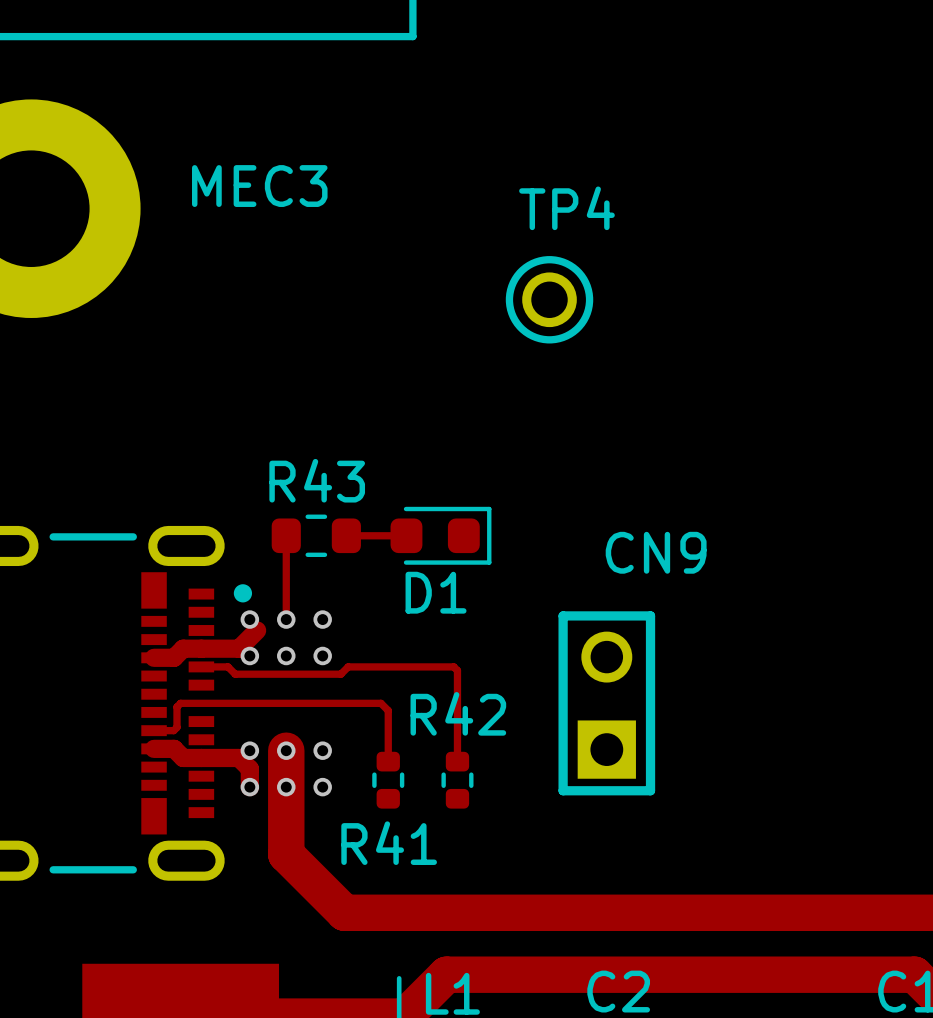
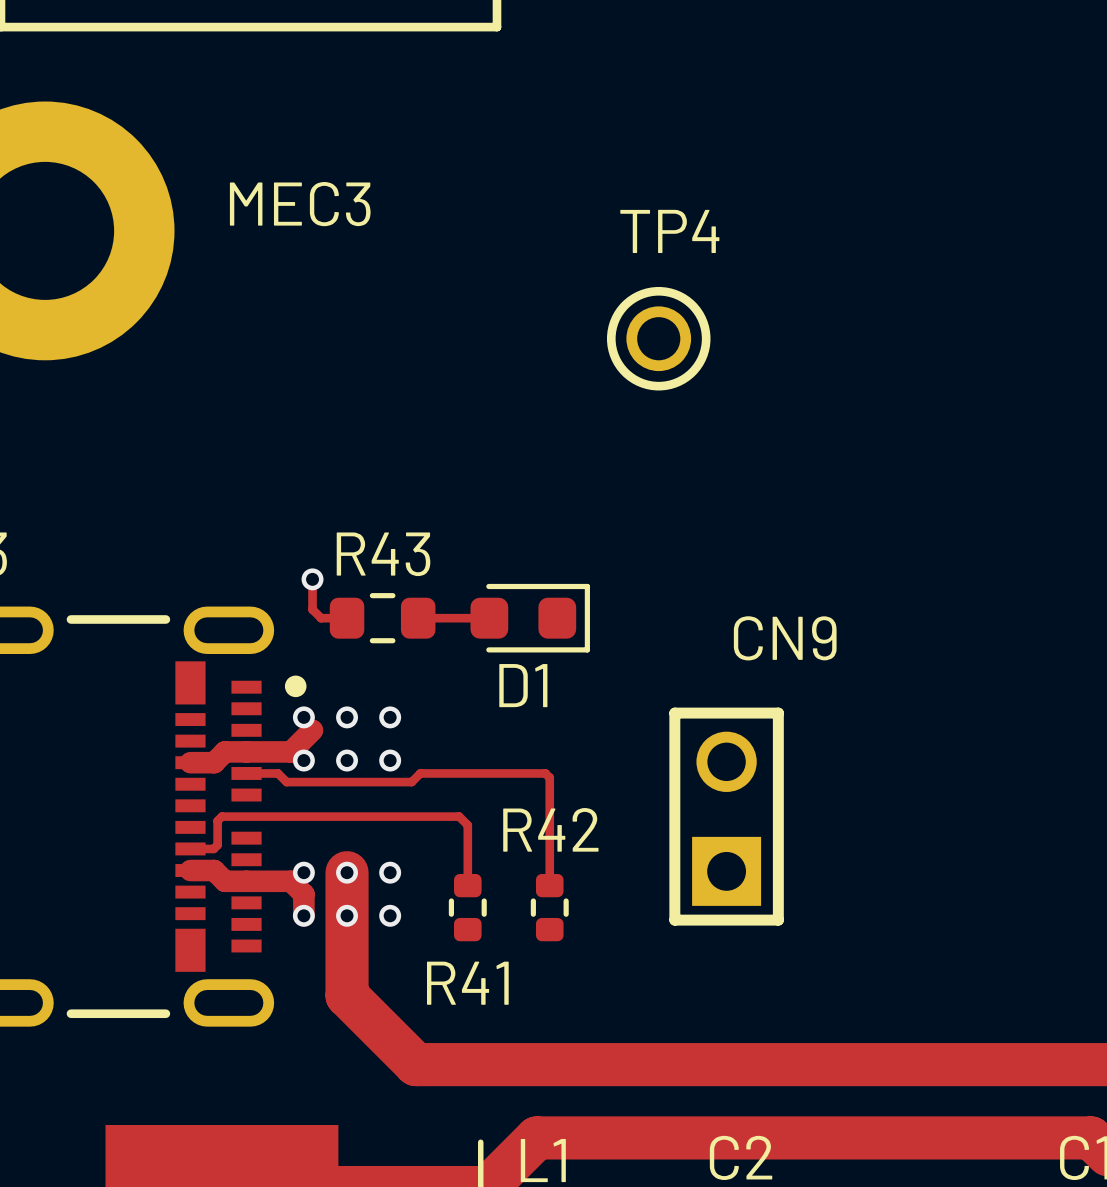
via: none -> (312, 579)
track: (286, 535) (286, 619) -> (347, 618) (321, 618) (312, 609) (312, 579)

